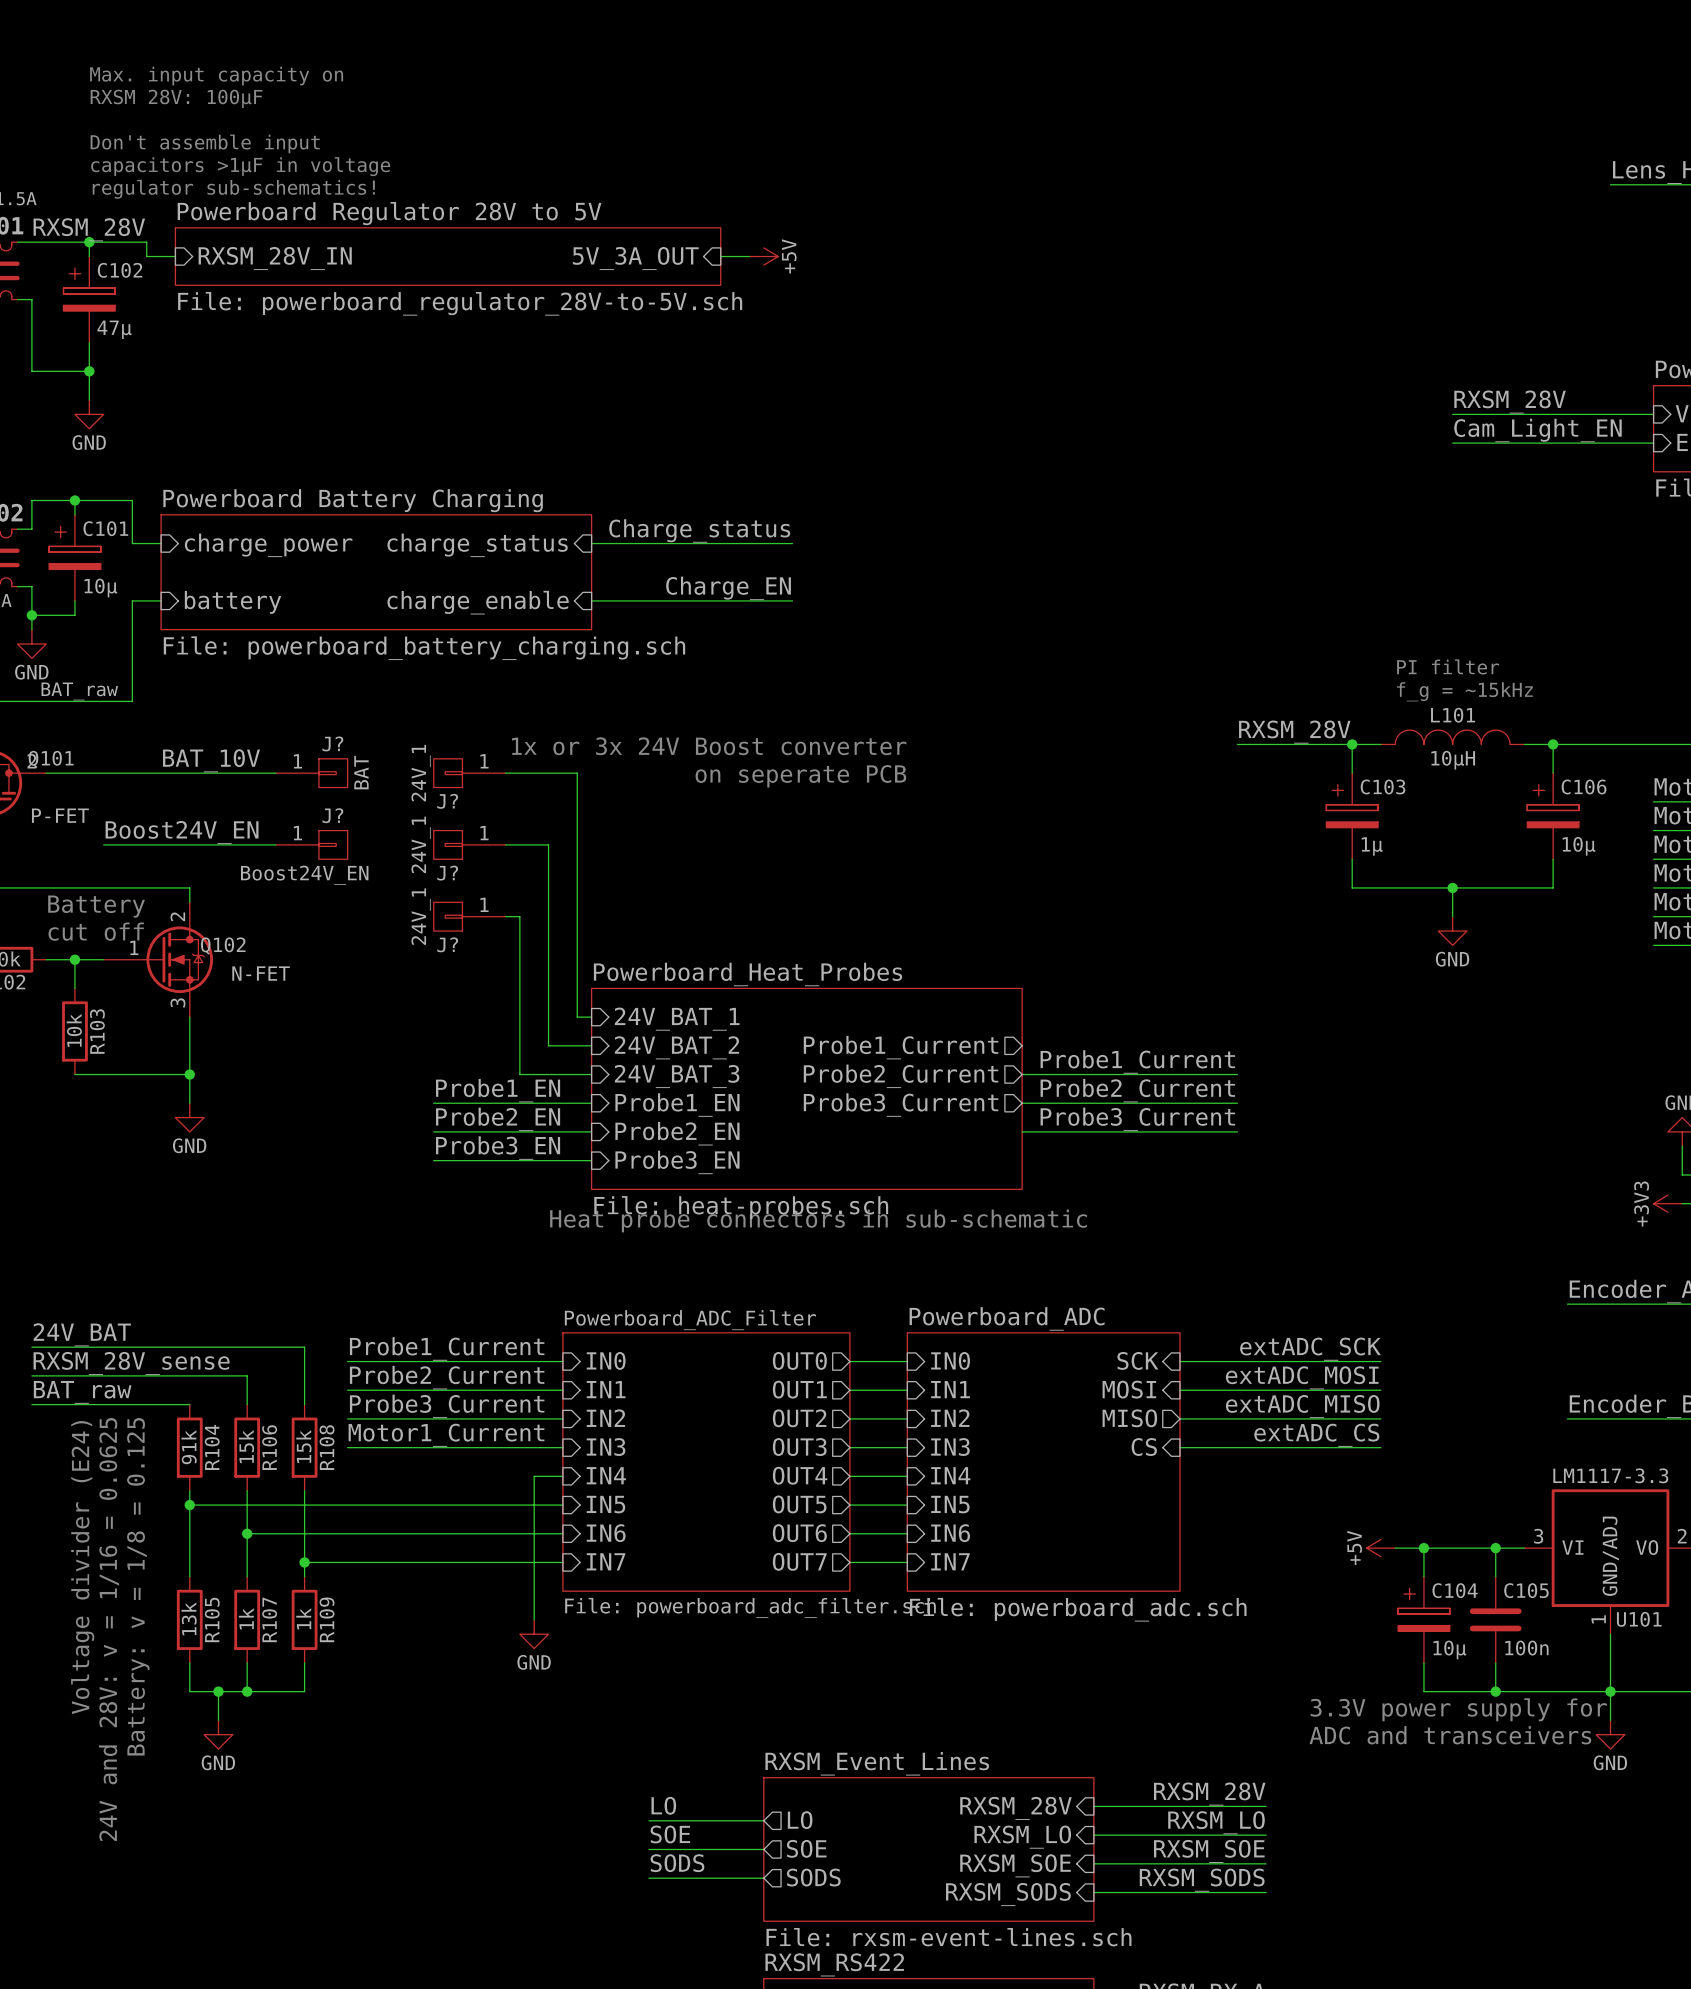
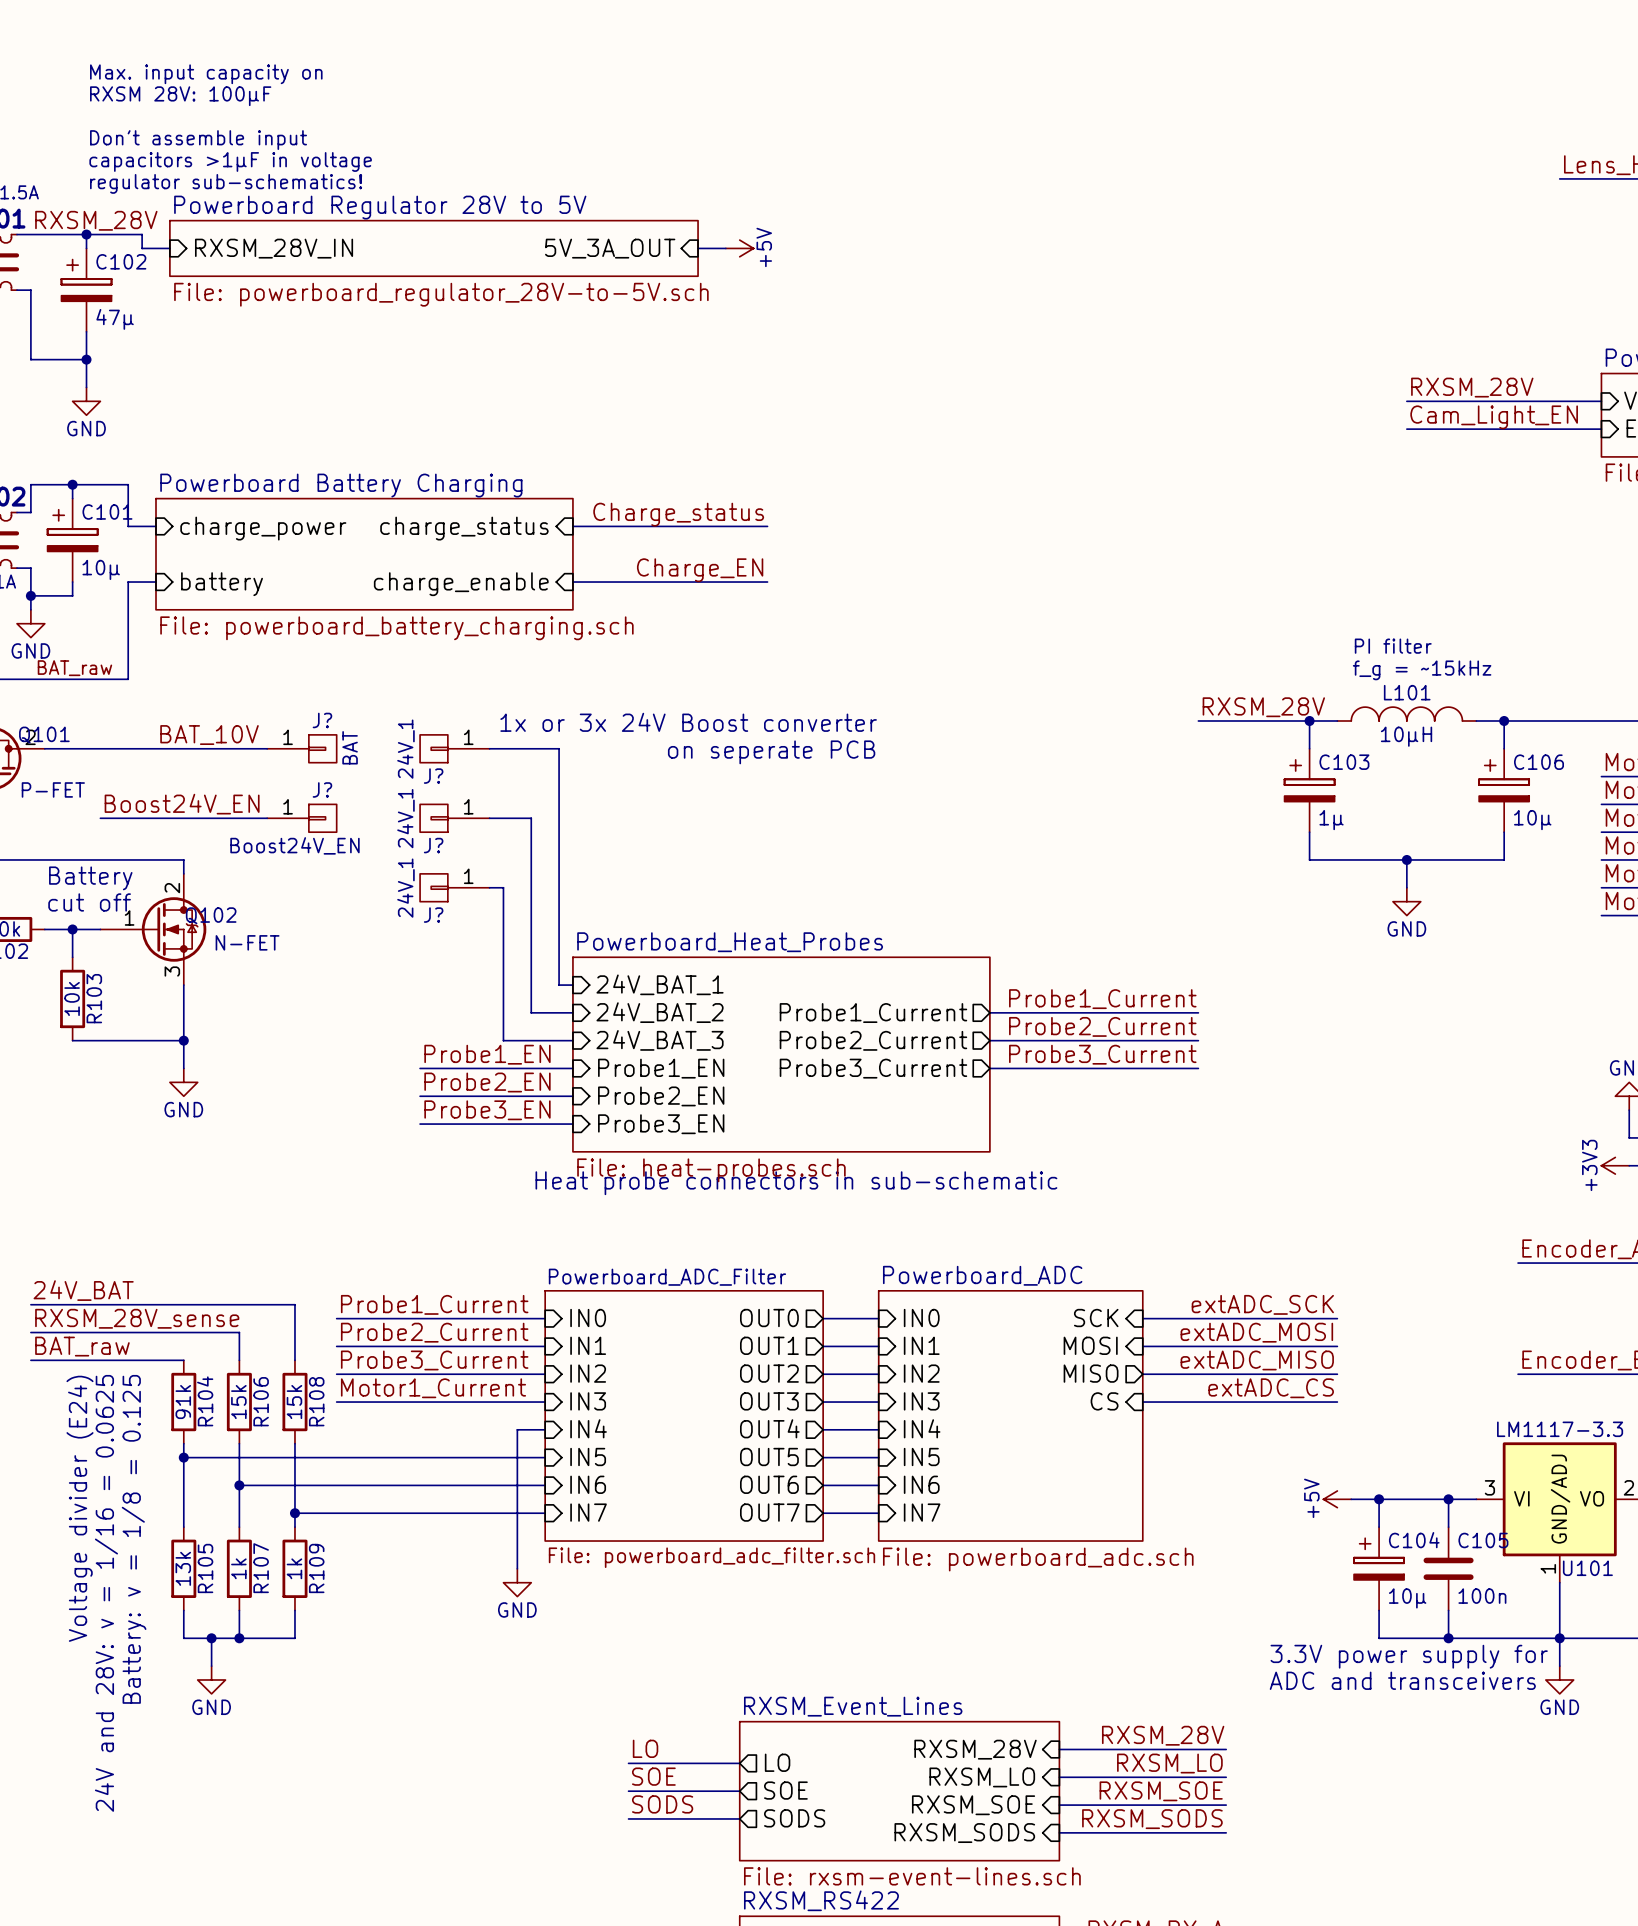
label: none -> Probe1_Current (1102, 999)
label: Probe1_Current (1137, 1061) -> Probe2_Current (1102, 1026)
label: Probe2_Current (1137, 1090) -> Probe3_Current (1102, 1054)
label: Probe3_Current (1137, 1119) -> none
wire: (1022, 1131) (1237, 1131) -> (989, 1012) (1198, 1012)

